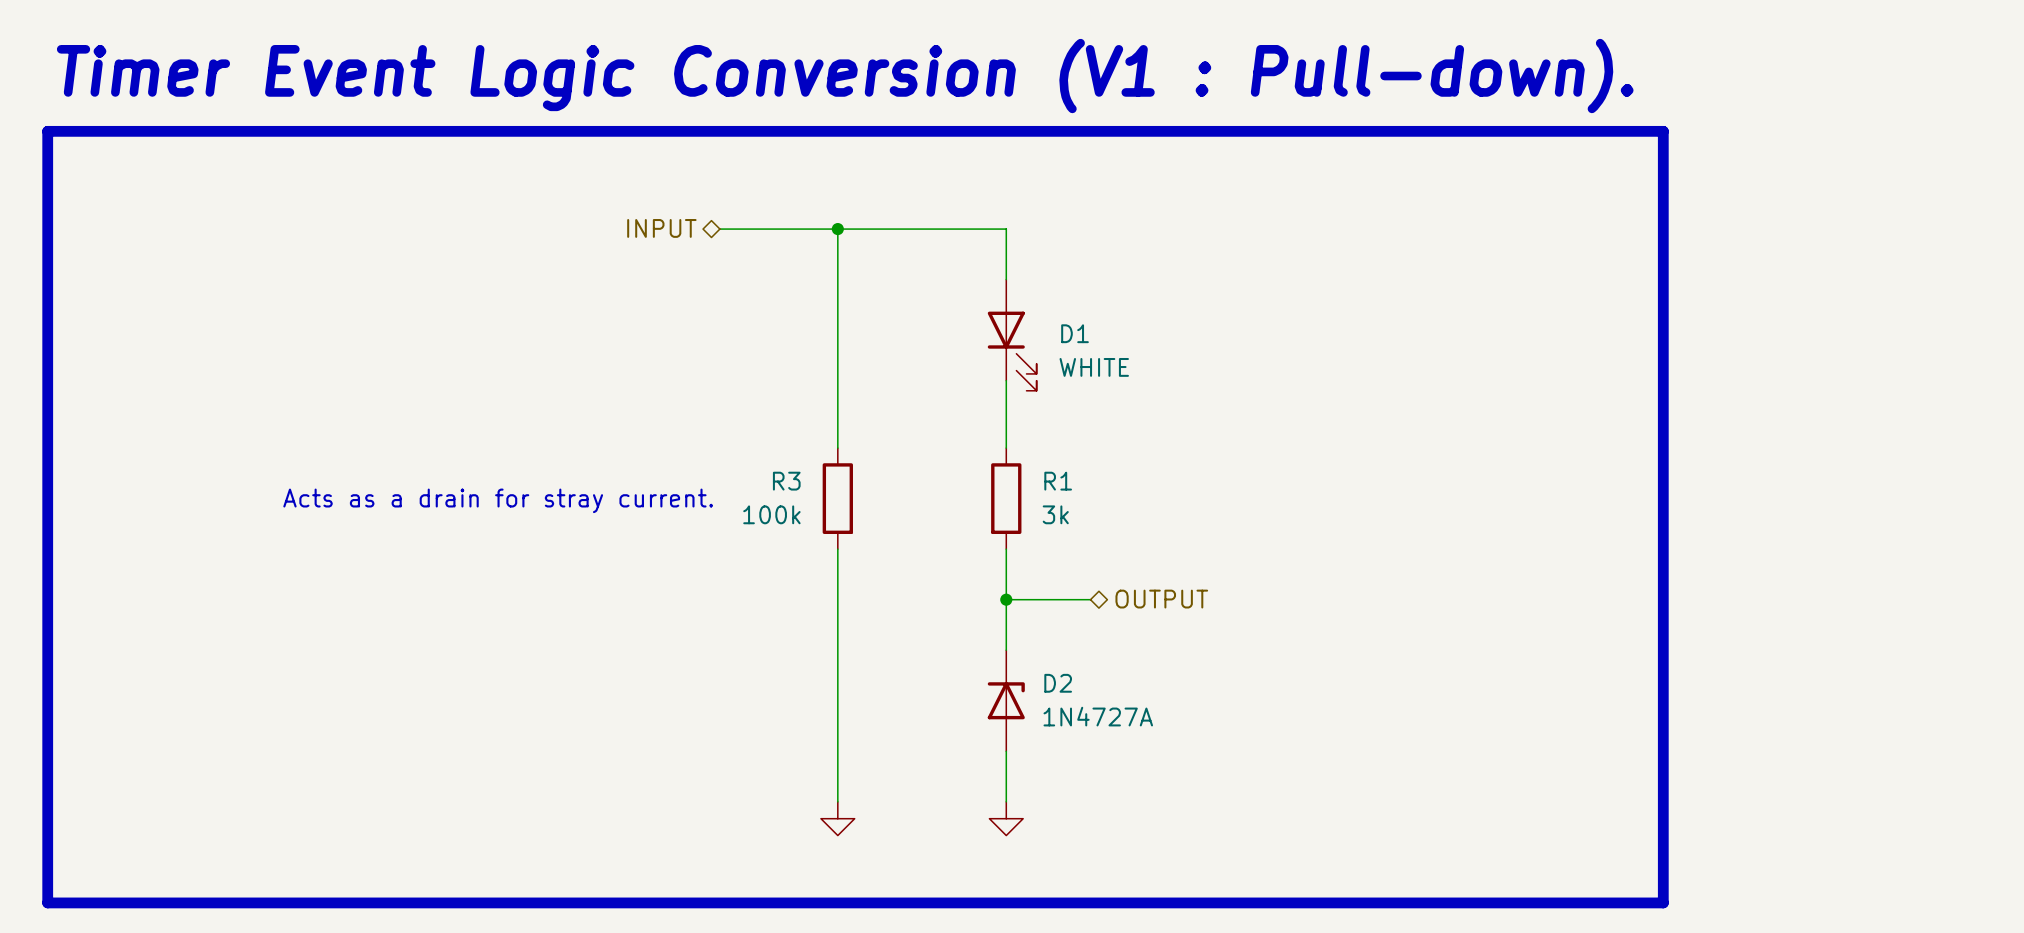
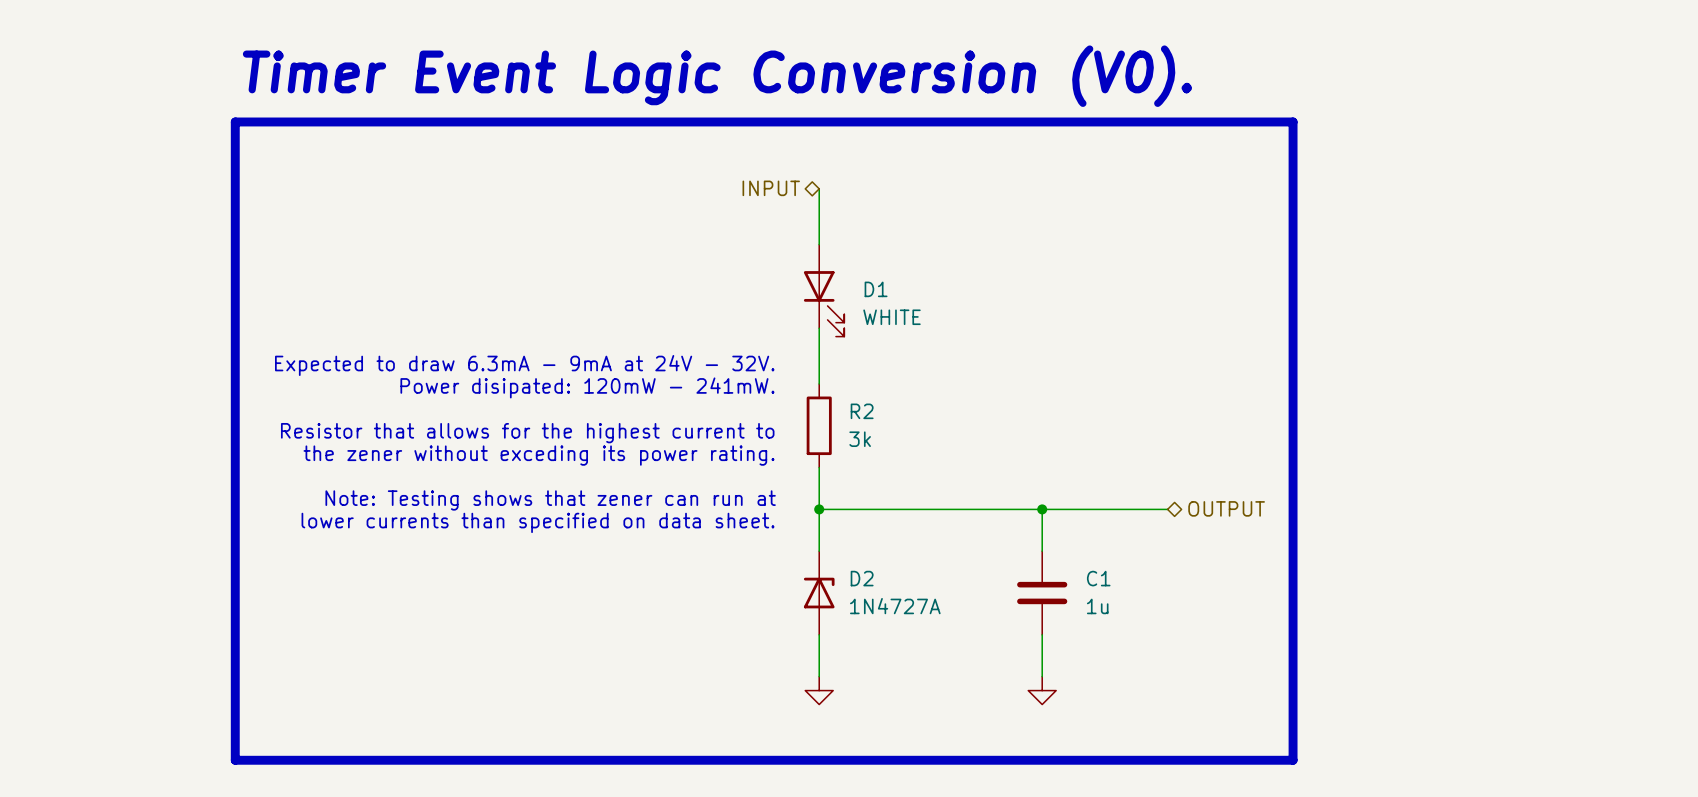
text: Timer Event Logic Conversion (V1 : Pull-down). (845, 76) -> Timer Event Logic Conversion (V0). (717, 76)
line: (300, 131) (47, 131) (47, 902) (300, 902) -> (235, 121) (235, 760)
line: (1579, 131) (1663, 131) (1663, 902) (1579, 902) -> (1293, 121) (1293, 760)
hierarchical label position: INPUT (661, 228) -> INPUT (771, 188)
wire: (719, 229) (1006, 229) -> (819, 188) (819, 202)
wire: (837, 229) (837, 448) -> none
junction: (837, 229) -> none
text: none -> Expected to draw 6.3mA - 9mA at 24V - 32V. (524, 365)
text: none -> Power disipated: 120mW - 241mW. (587, 387)
R1 name: R1 (1058, 481) -> R2 (862, 411)
R3: 100k (837, 498) -> none
text: Acts as a drain for stray current. (498, 500) -> none
text: none -> Resistor that allows for the highest current to (527, 433)
text: none -> the zener without exceding its power rating. (539, 455)
wire: (837, 549) (837, 801) -> none
text: none -> Note: Testing shows that zener can run at (550, 500)
wire: none -> (888, 509) (1167, 509)
hierarchical label: OUTPUT (1161, 599) -> none
wire: none -> (1042, 509) (1042, 551)
junction: none -> (1042, 509)
hierarchical label: none -> OUTPUT (1226, 508)
text: none -> lower currents than specified on data sheet. (538, 522)
C1: none -> 1u (1042, 593)
wire: none -> (1042, 634) (1042, 676)
power symbol: (837, 818) -> none
power symbol: none -> (1042, 690)

